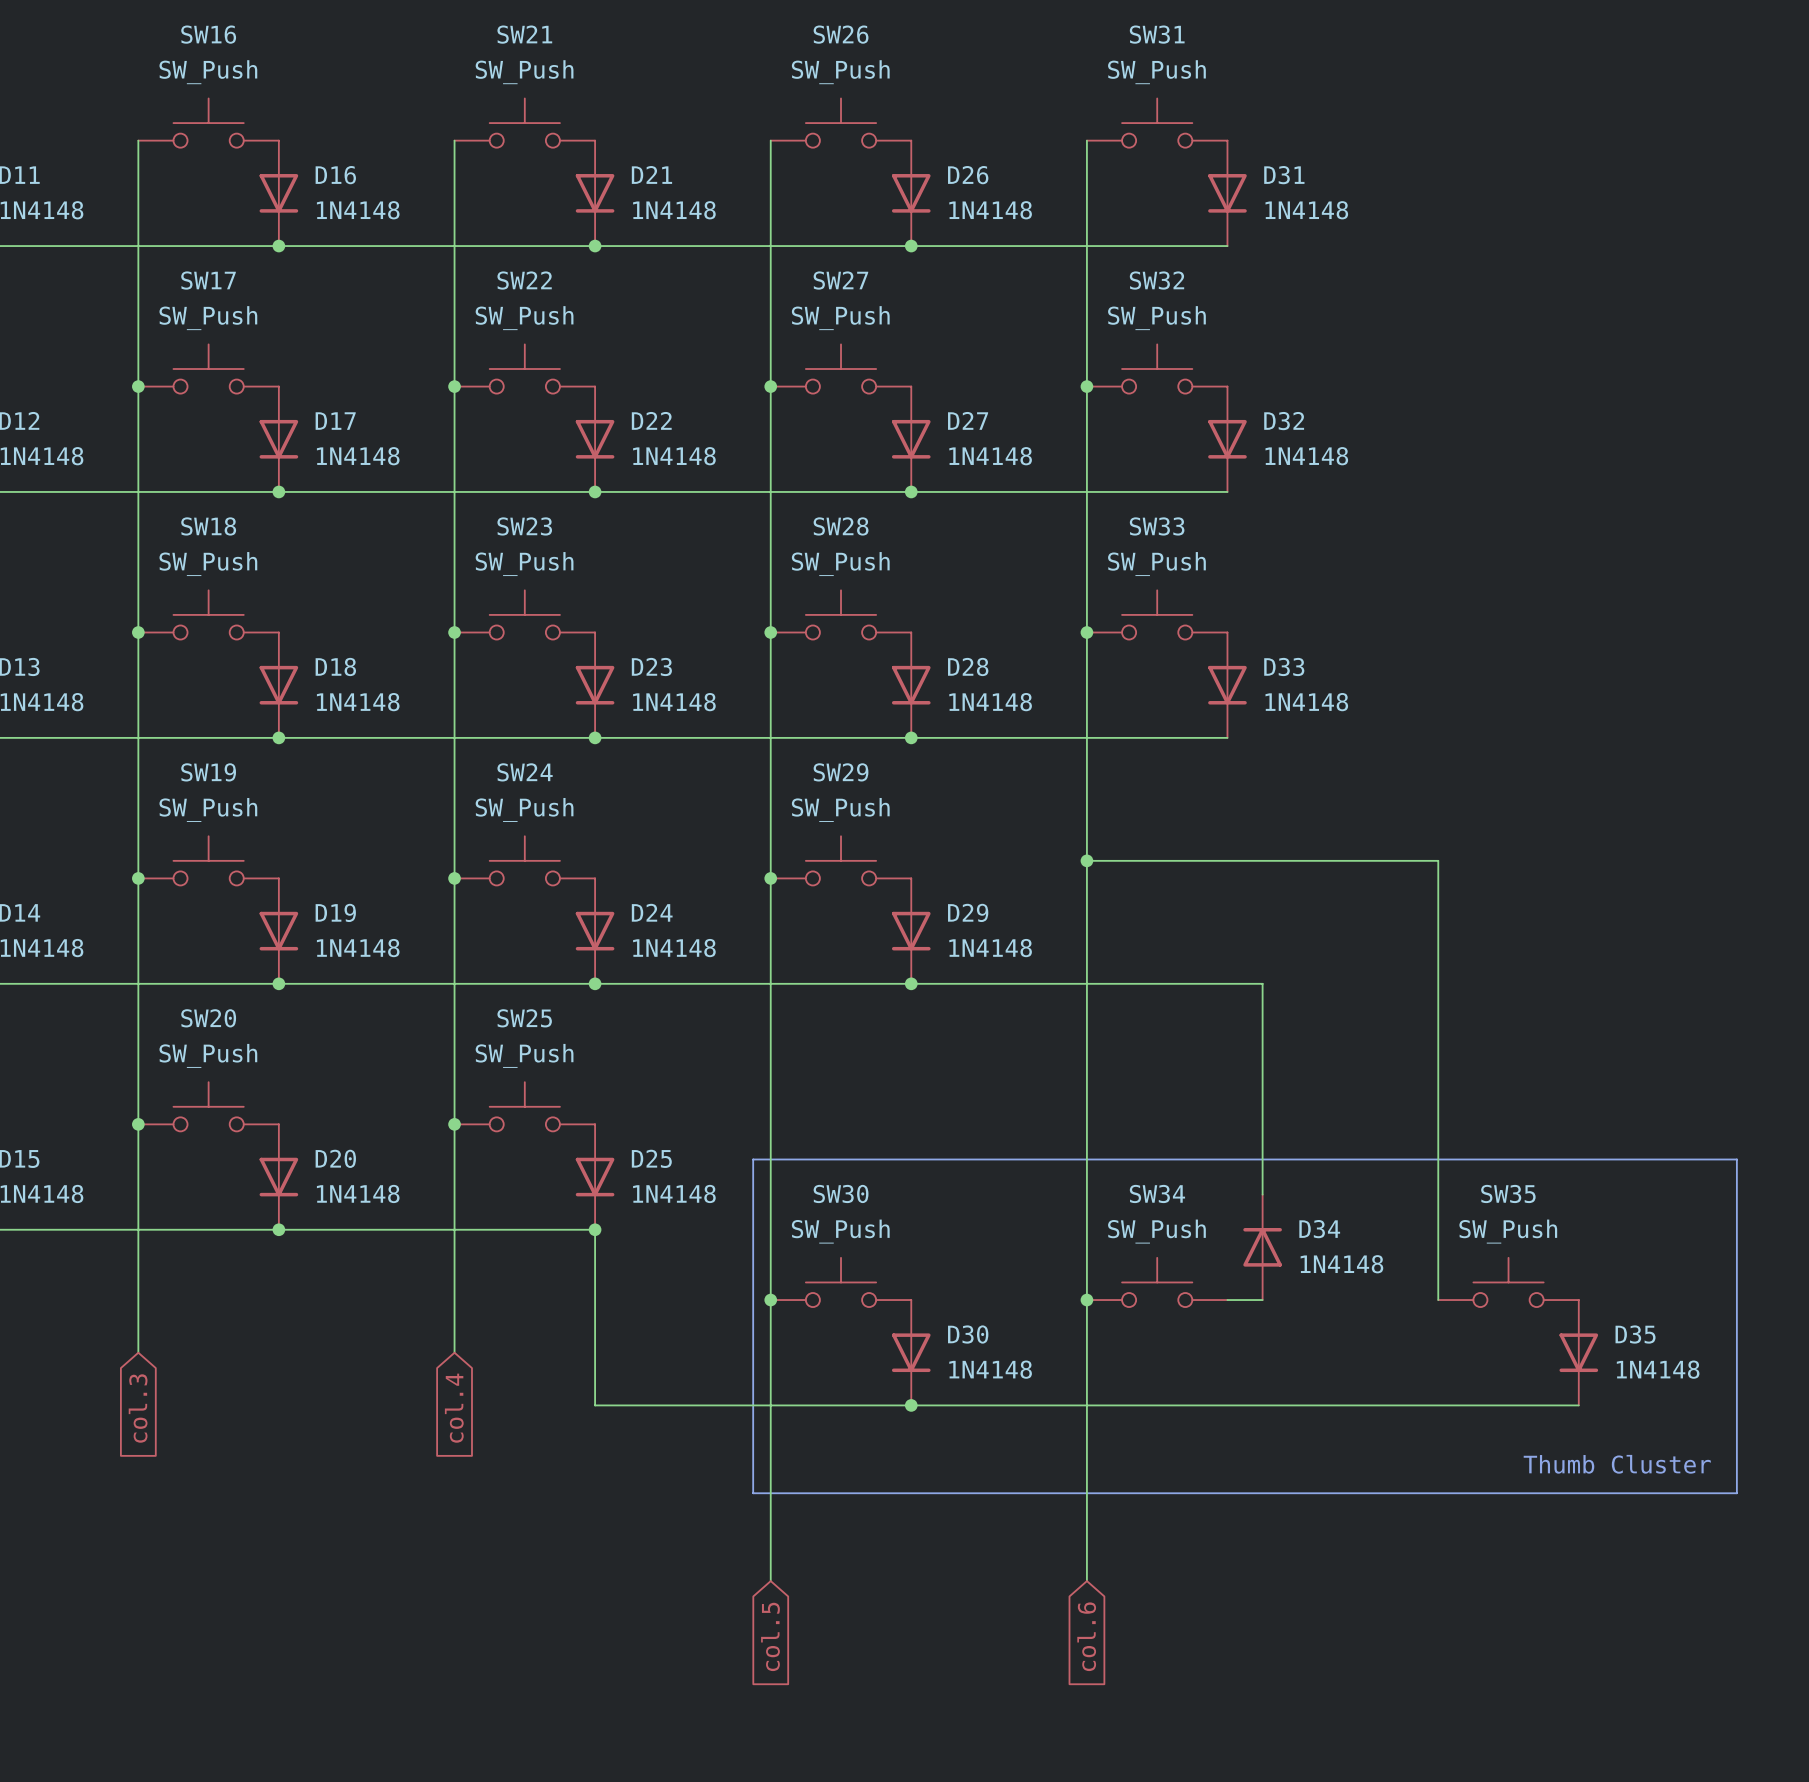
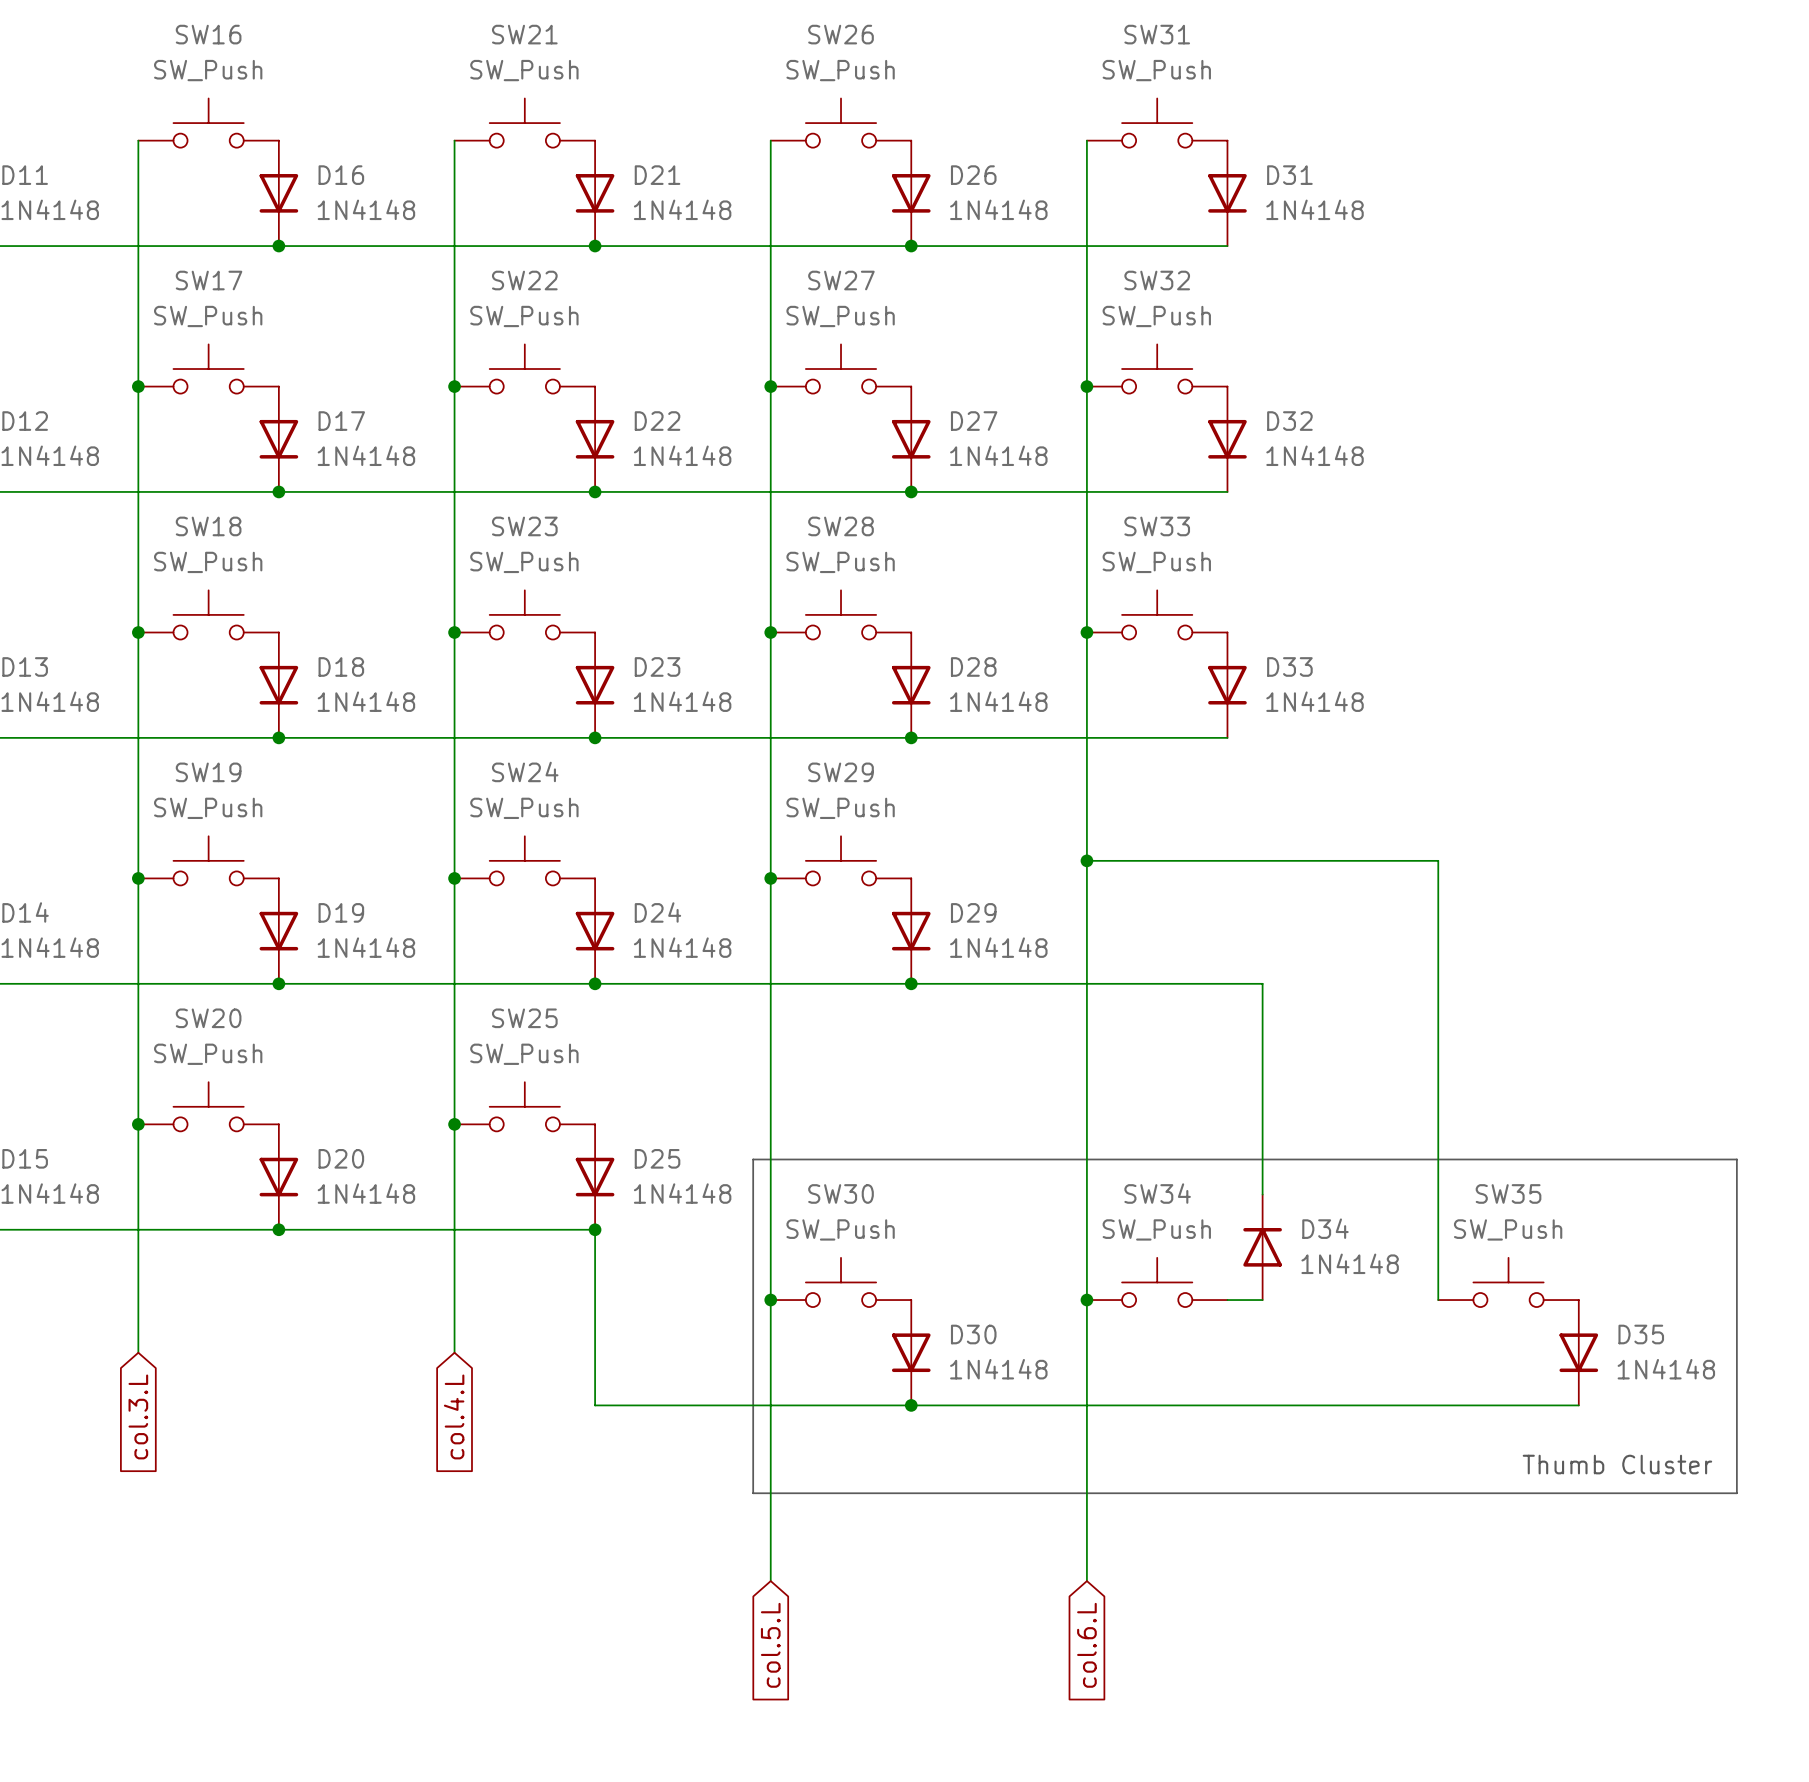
global label: col.3 (138, 1408) -> col.3.L (138, 1416)
global label: col.4 (454, 1408) -> col.4.L (454, 1416)
global label: col.5 (770, 1636) -> col.5.L (770, 1645)
global label: col.6 (1086, 1636) -> col.6.L (1086, 1645)

